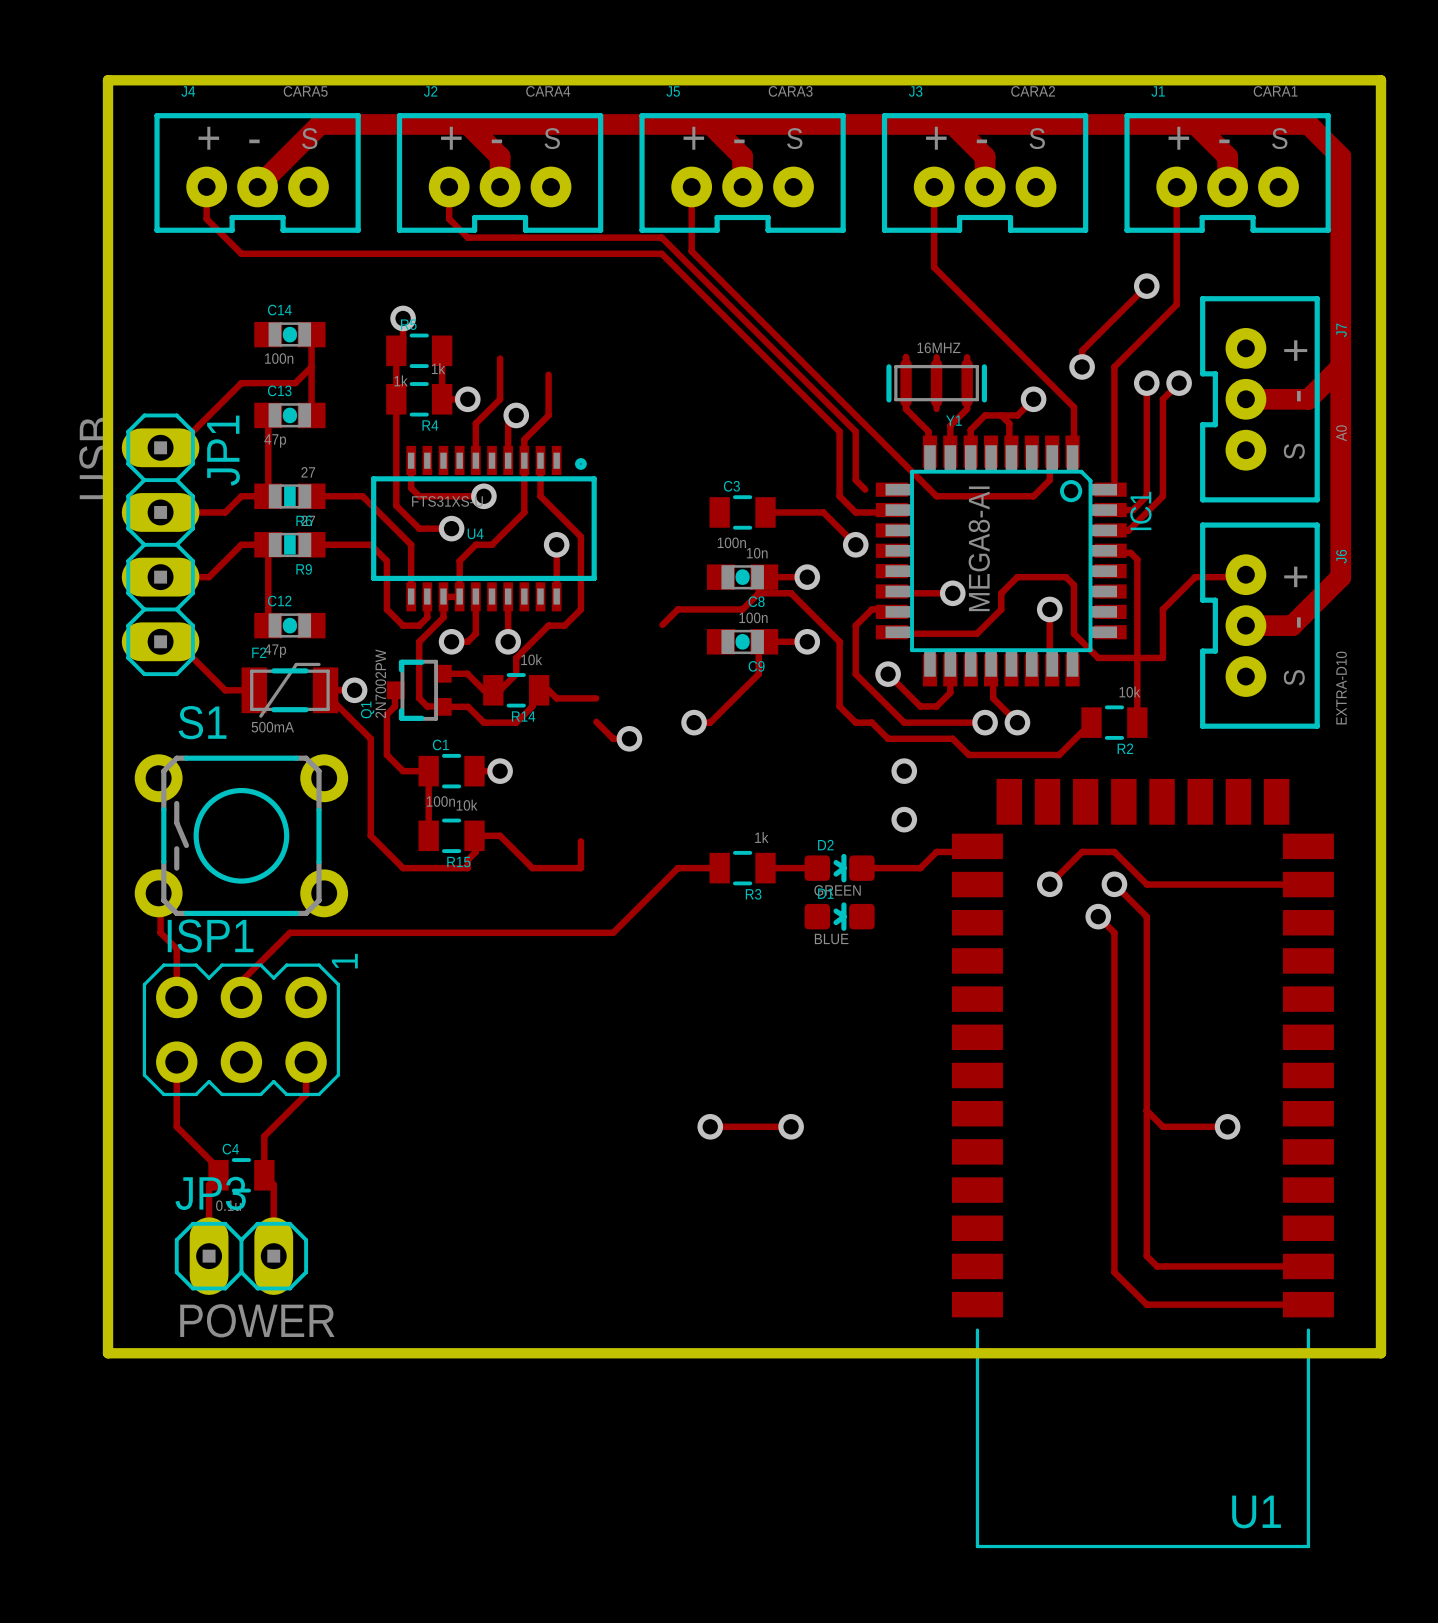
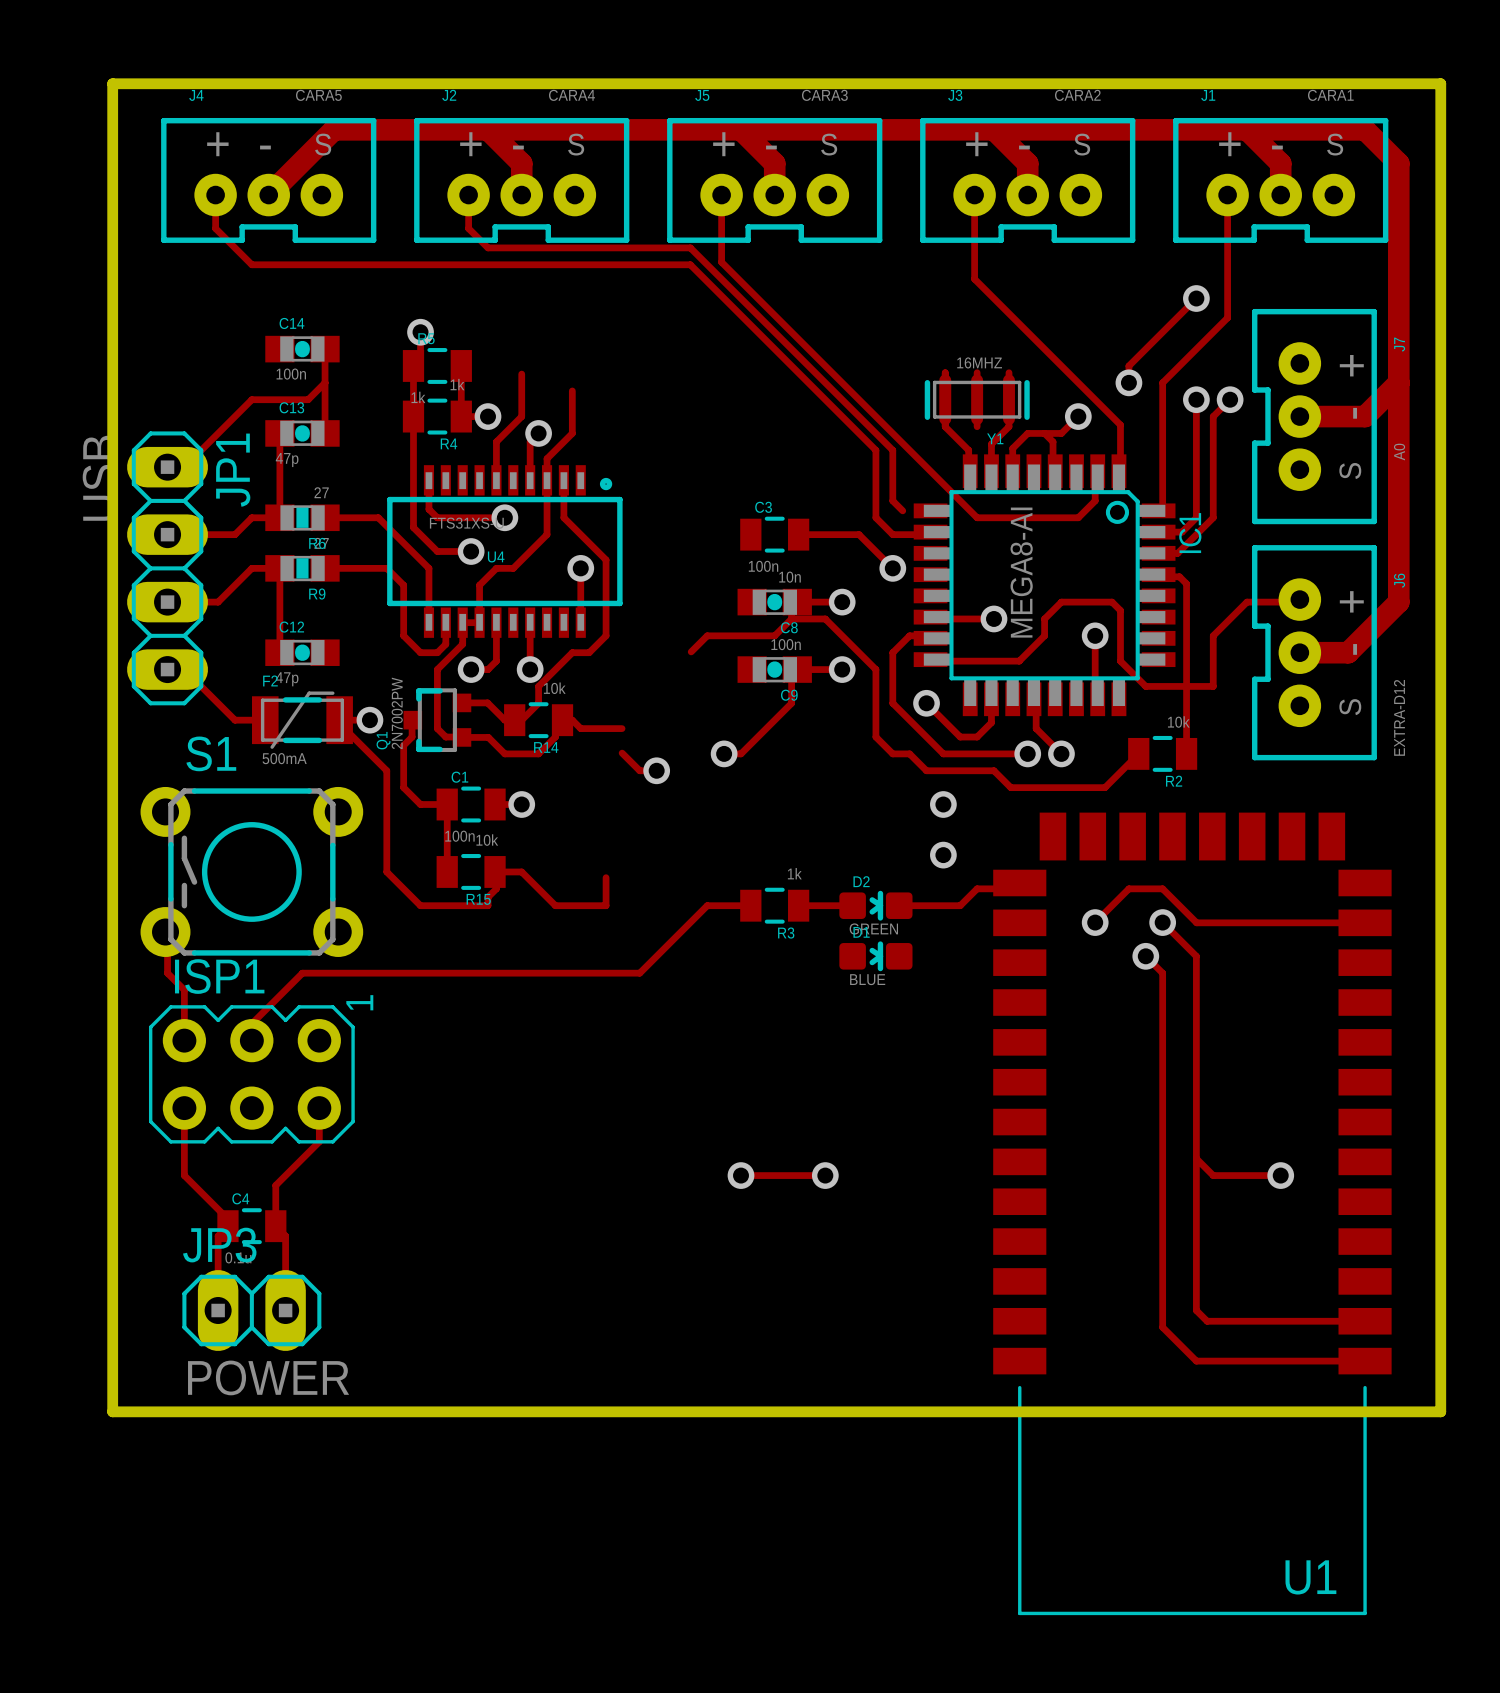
J6 value: EXTRA-D10 (1341, 688) -> EXTRA-D12 (1399, 717)

